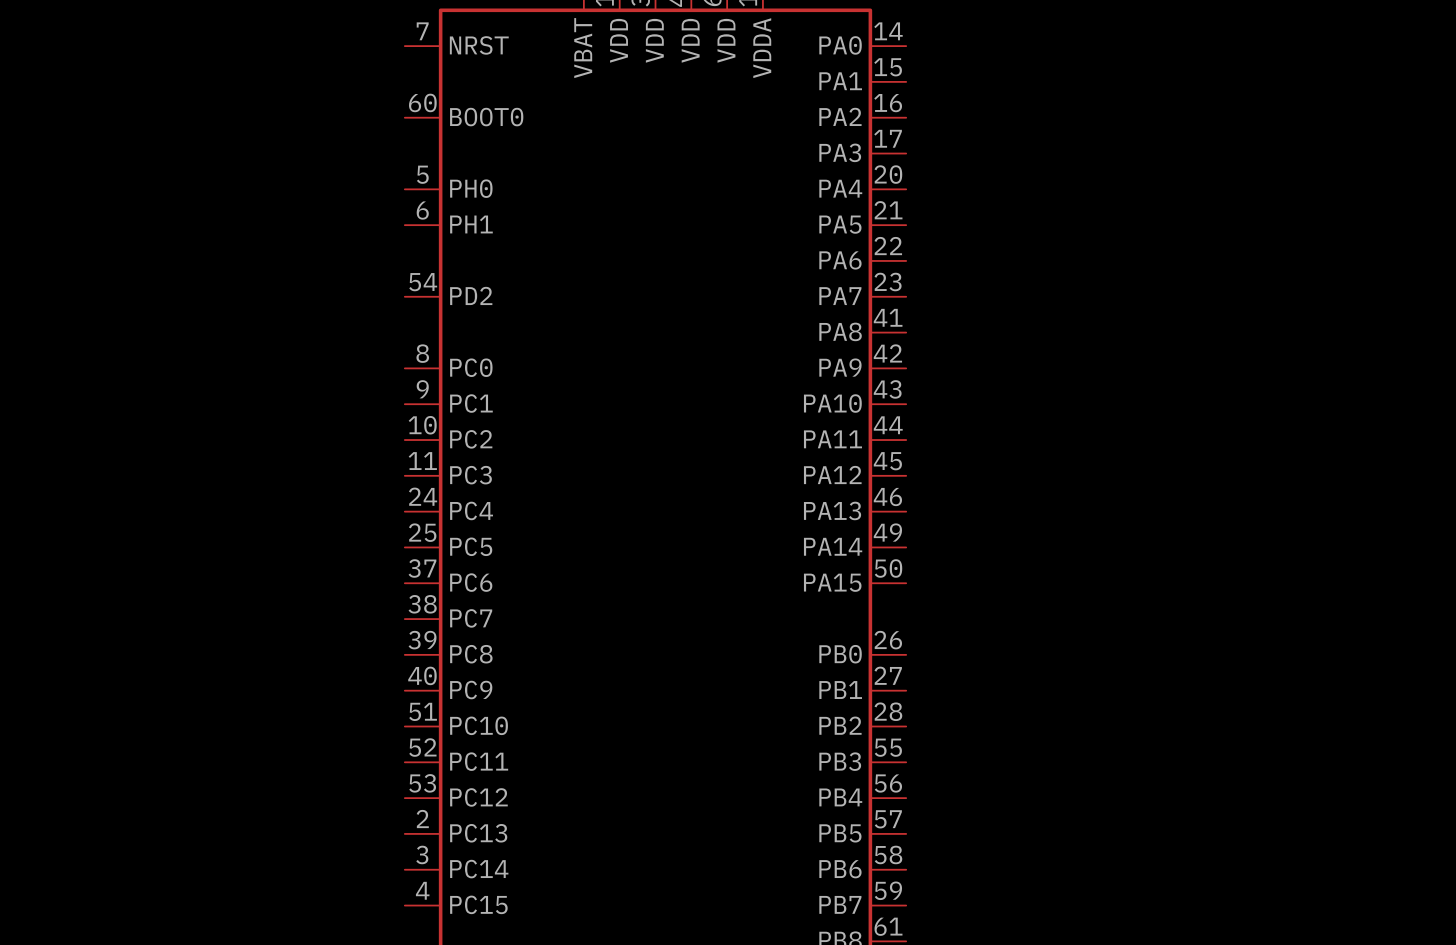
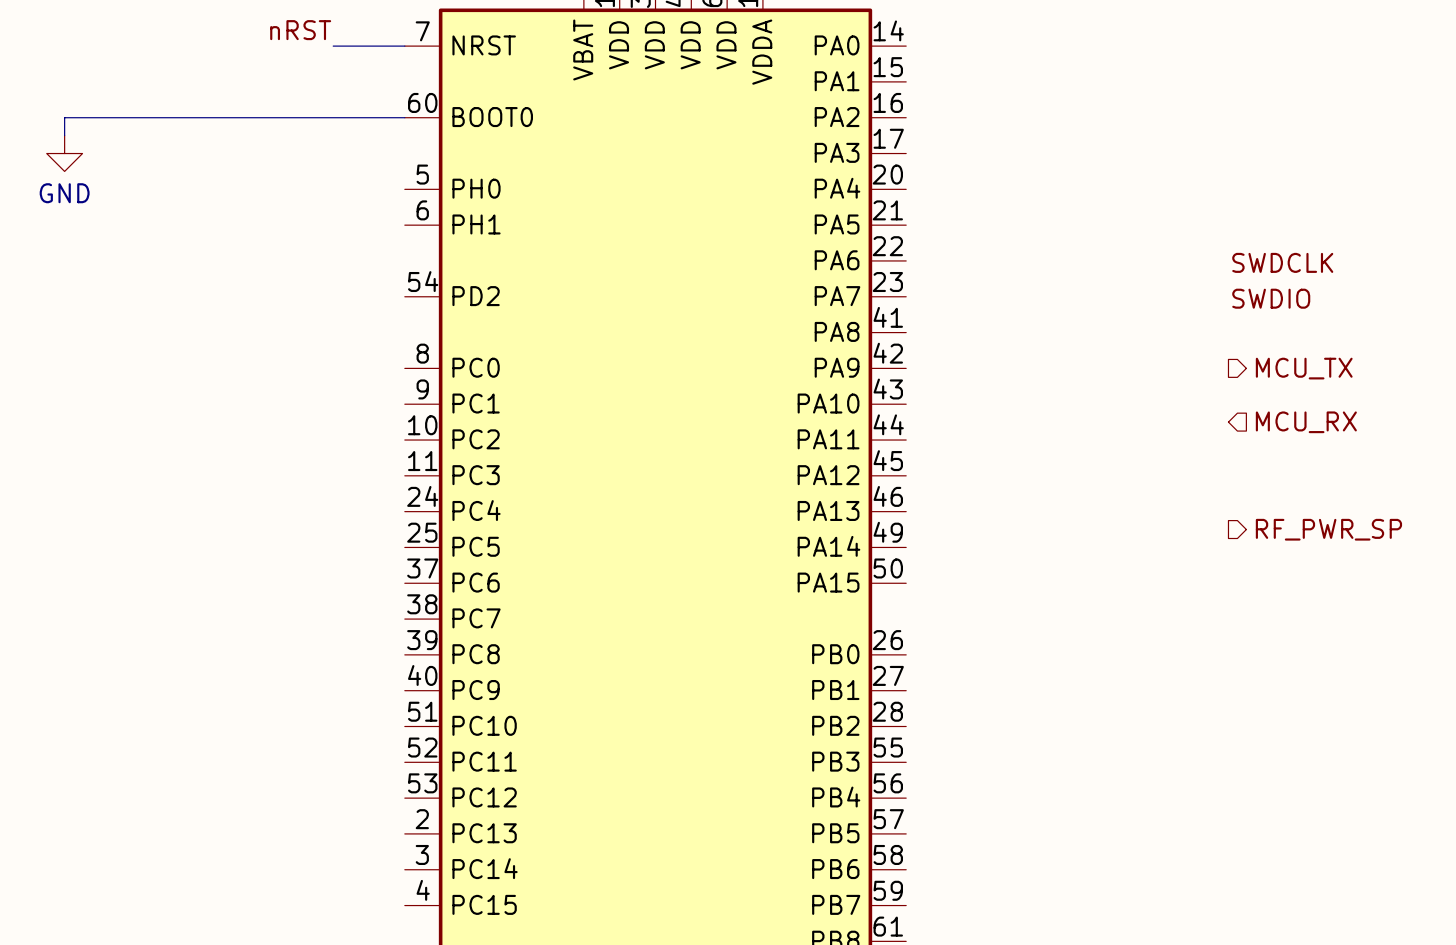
label: none -> nRST (300, 30)
wire: none -> (333, 46) (404, 46)
wire: none -> (404, 117) (64, 117) (64, 135)
power symbol: none -> GND (64, 153)
label: none -> SWDCLK (1282, 262)
label: none -> SWDIO (1271, 298)
hierarchical label: none -> MCU_TX (1304, 368)
hierarchical label: none -> MCU_RX (1306, 422)
hierarchical label: none -> RF_PWR_SP (1328, 529)

